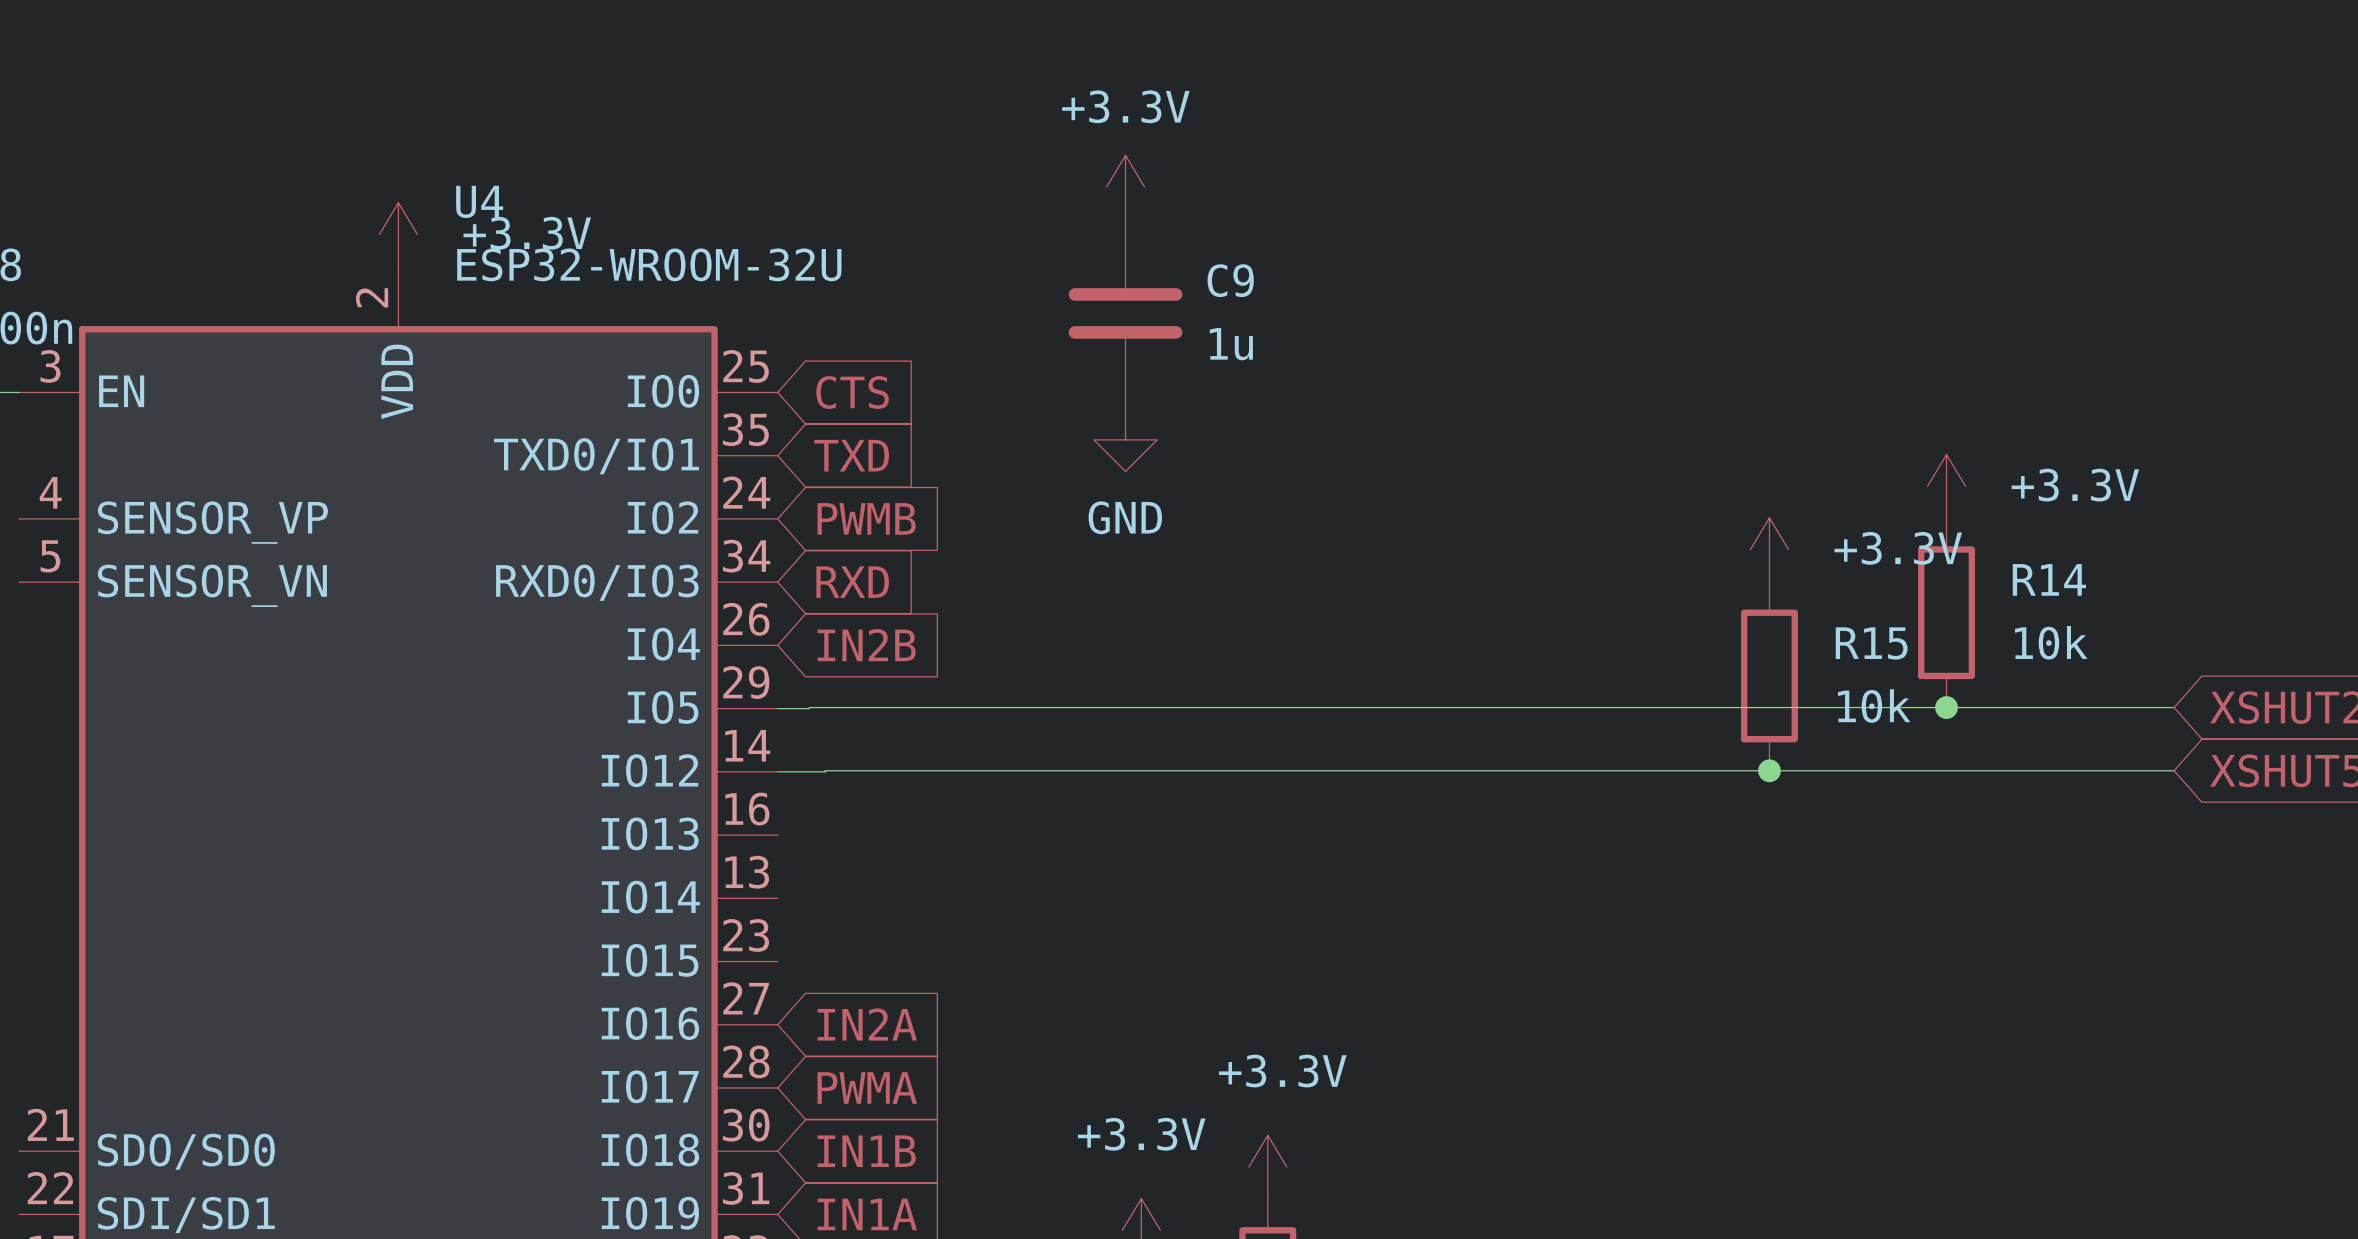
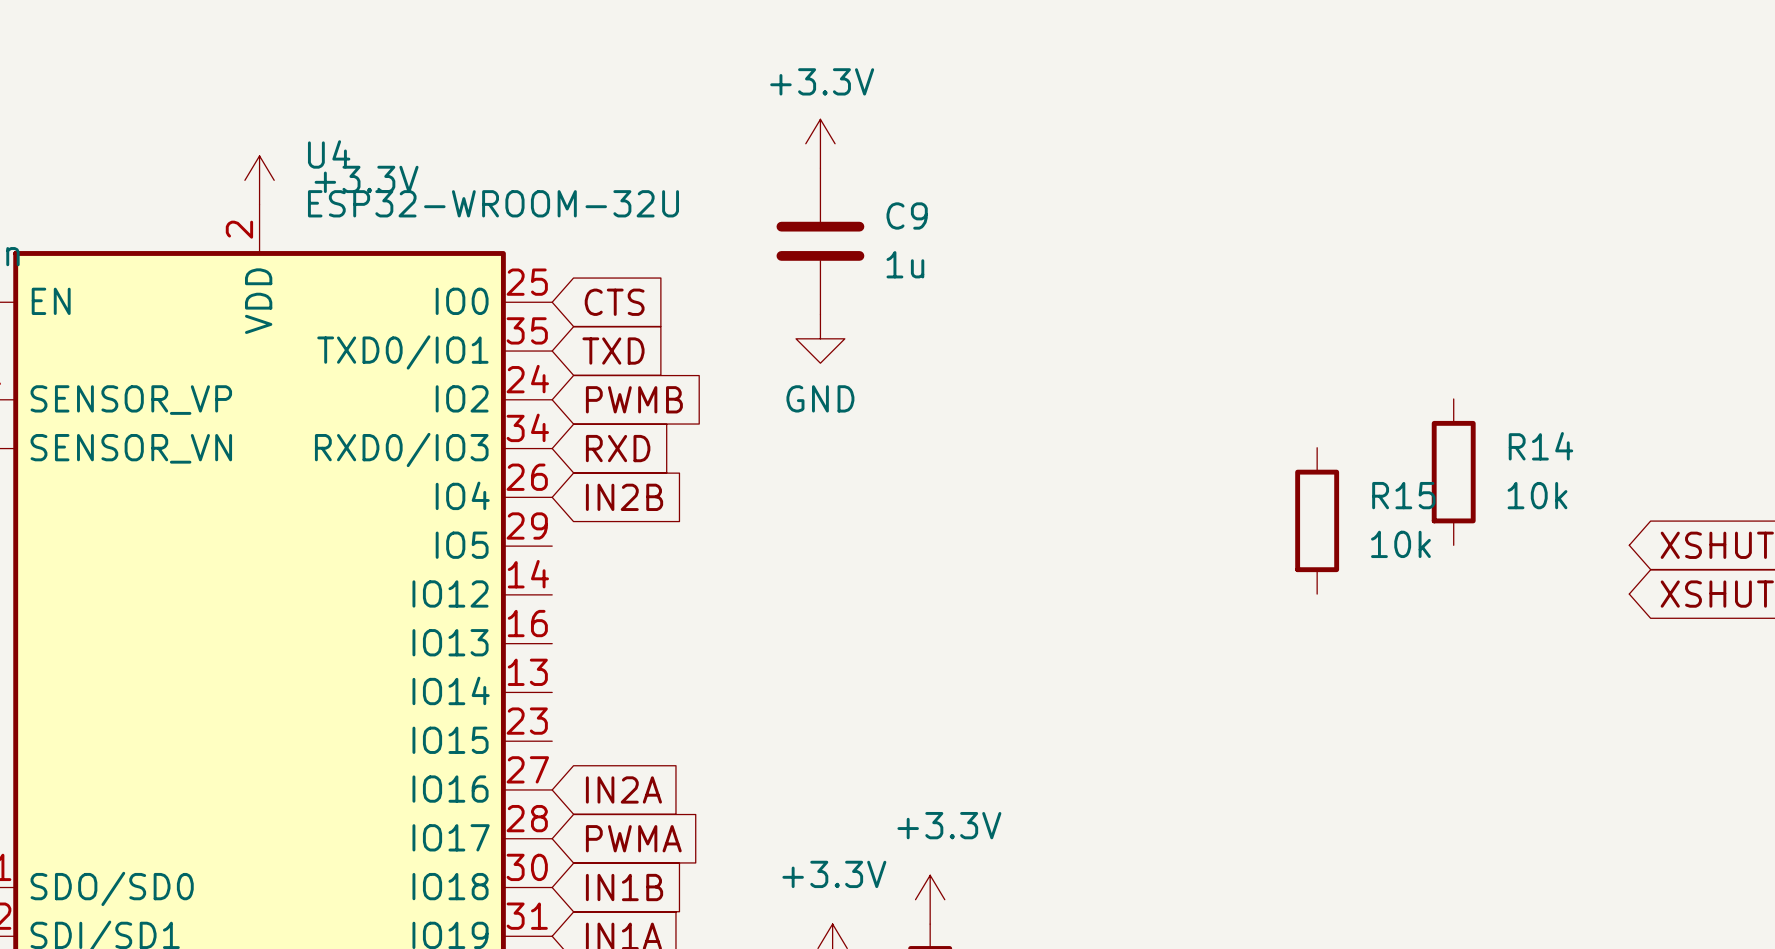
power symbol: +3.3V (1946, 486) -> none
power symbol: +3.3V (1769, 549) -> none
junction: (1946, 707) -> none
wire: (2174, 707) (777, 708) -> none
junction: (1769, 770) -> none
wire: (2174, 770) (777, 771) -> none

